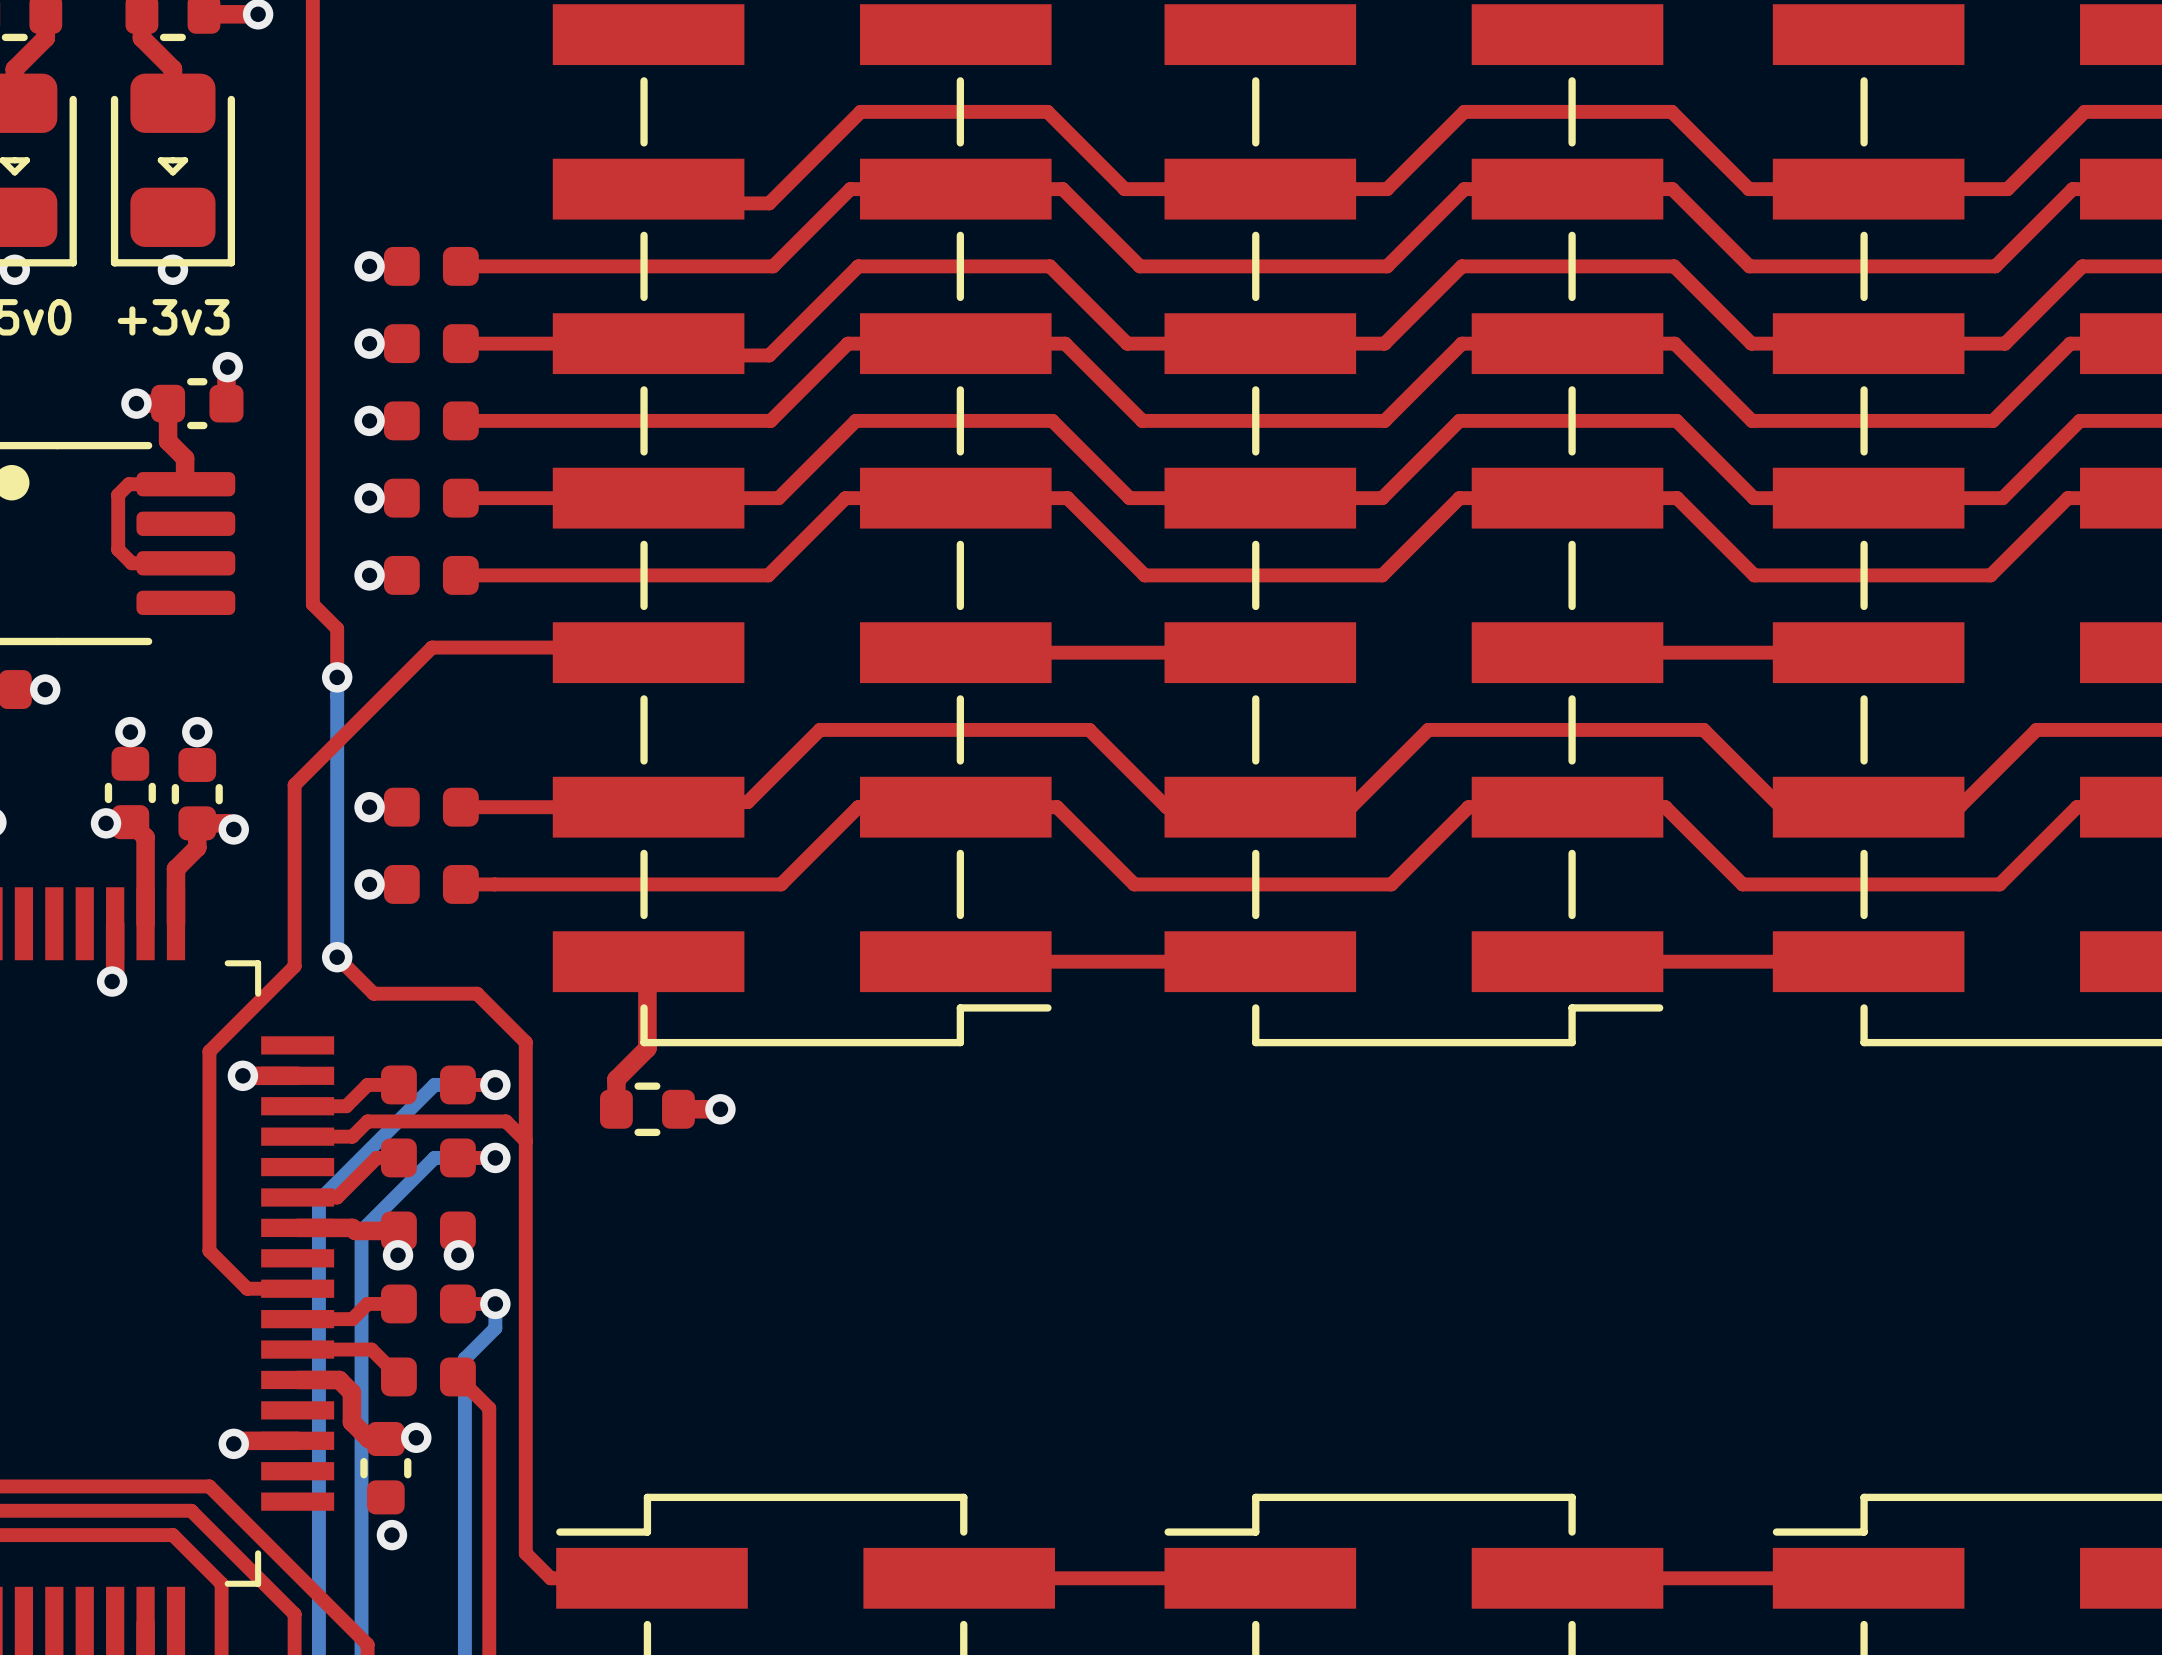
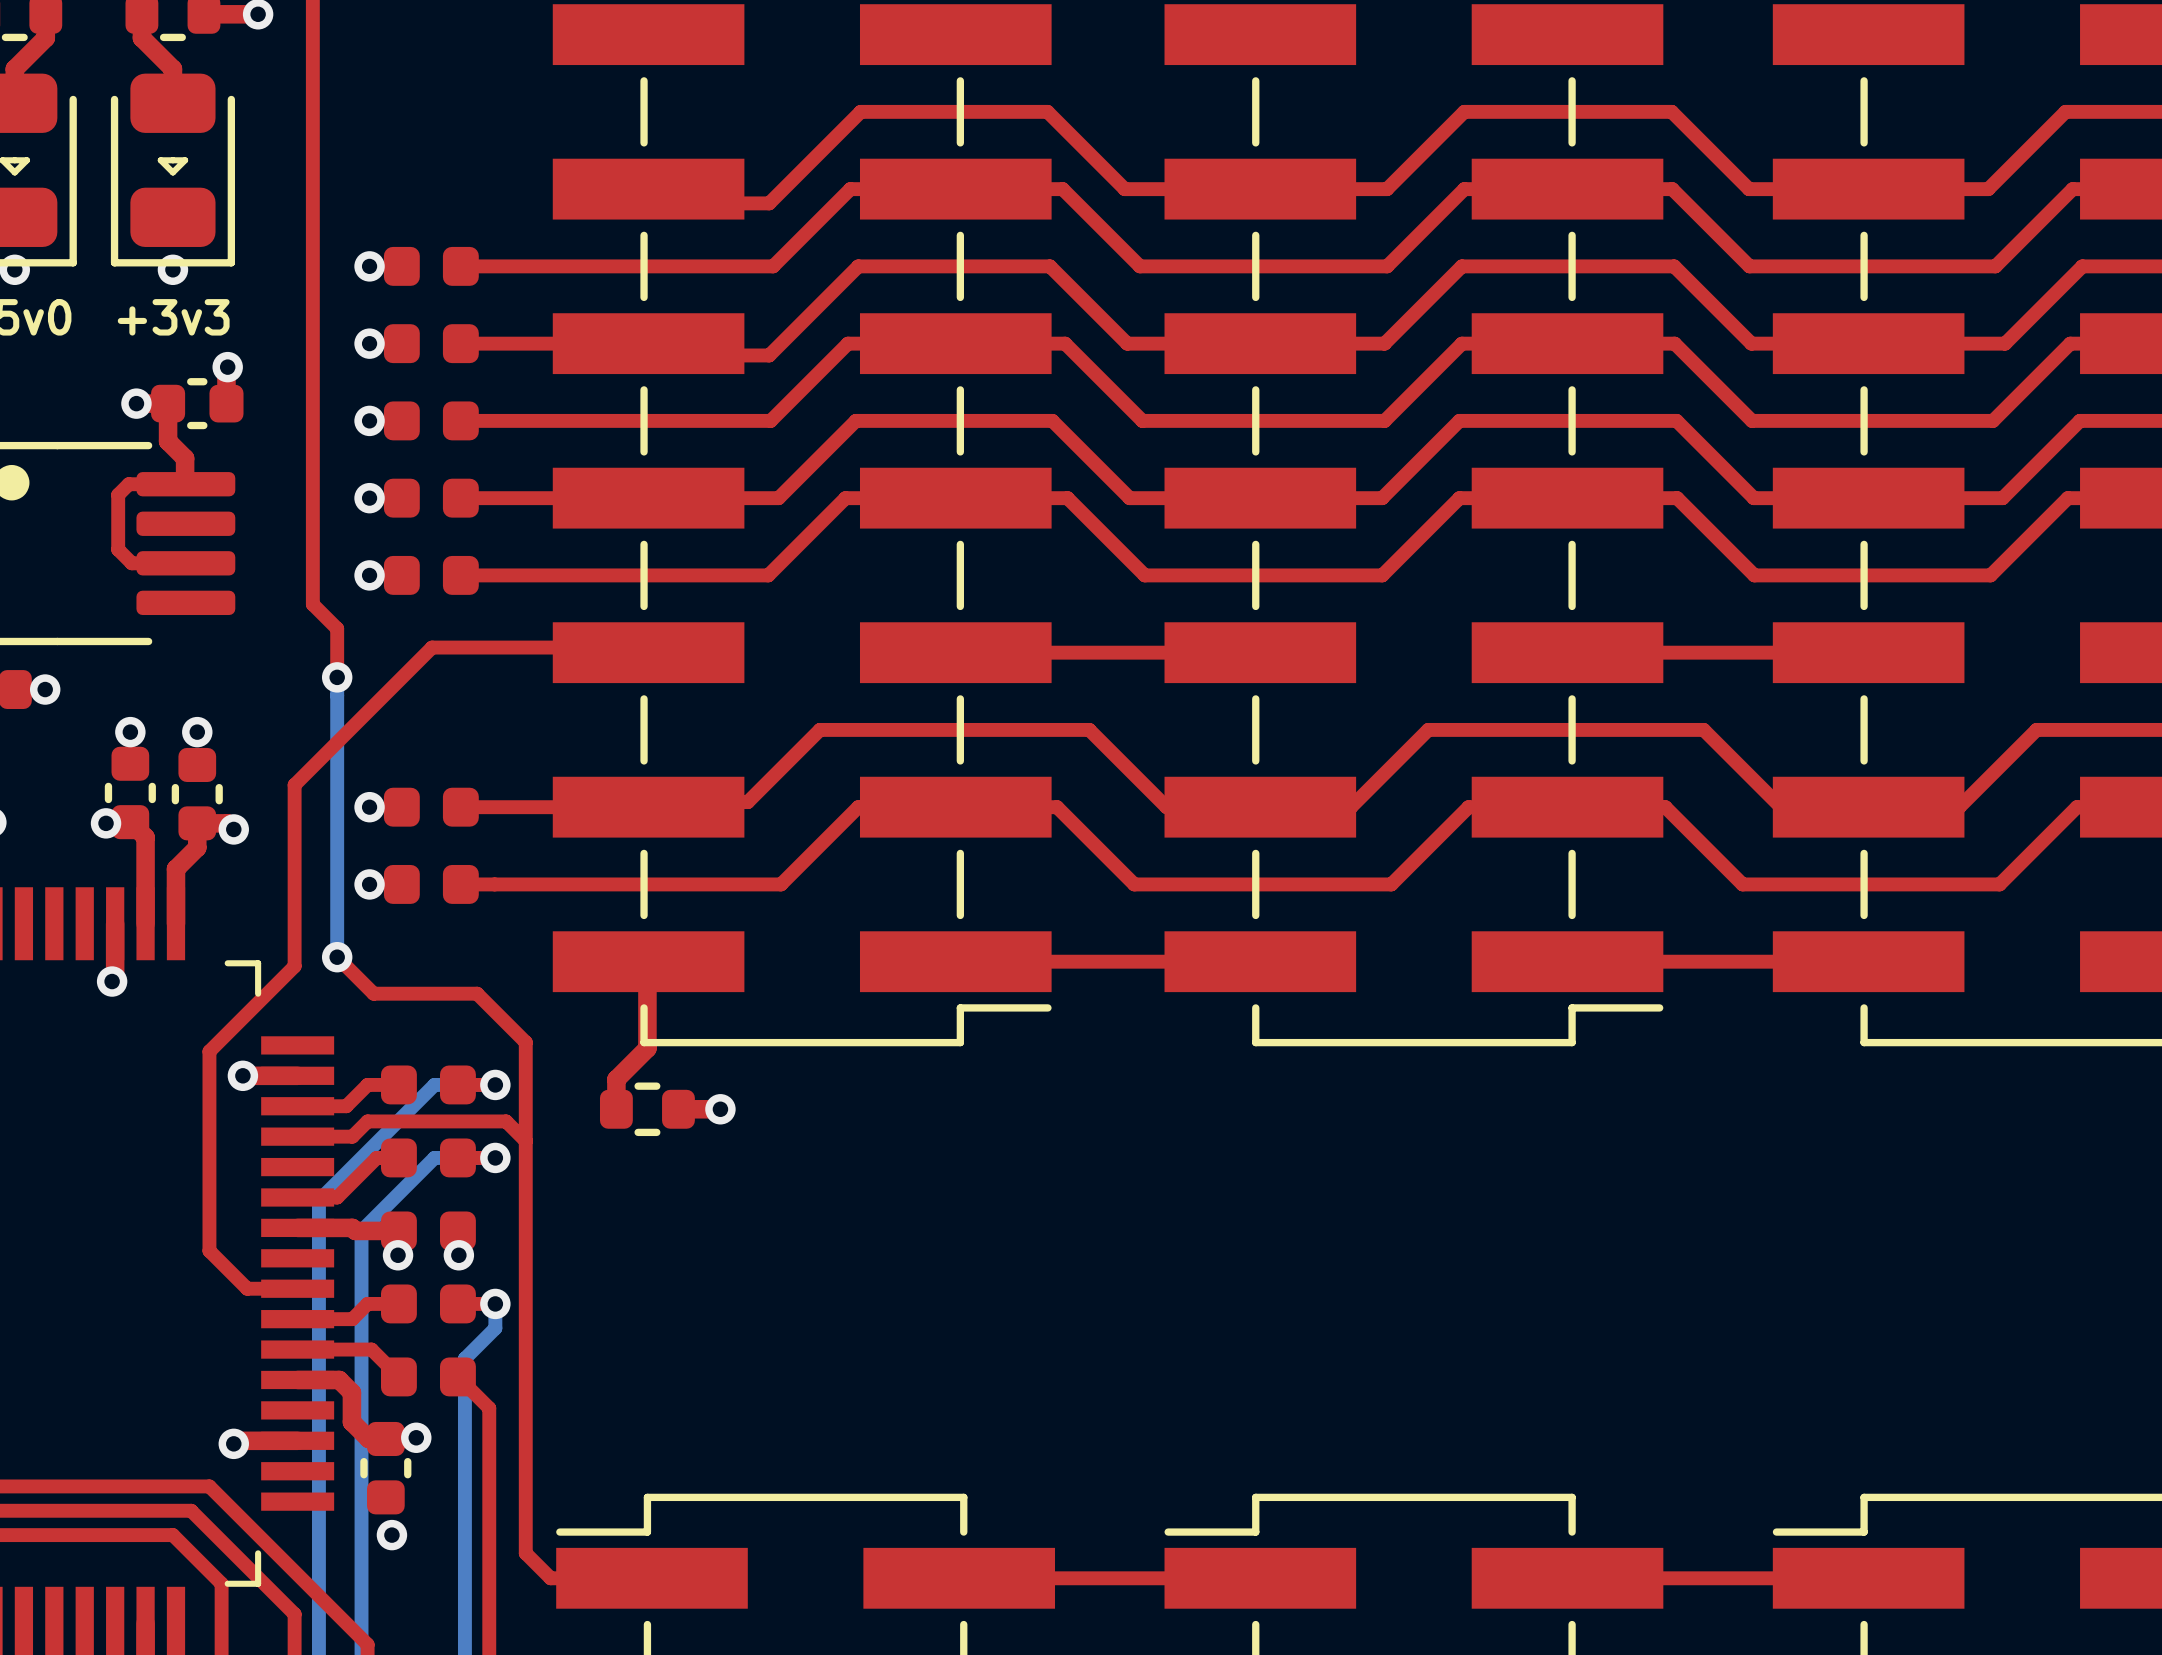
top track: (2084, 111) (2007, 189) (1988, 189) -> (2084, 111) (2065, 111) (1988, 189)

